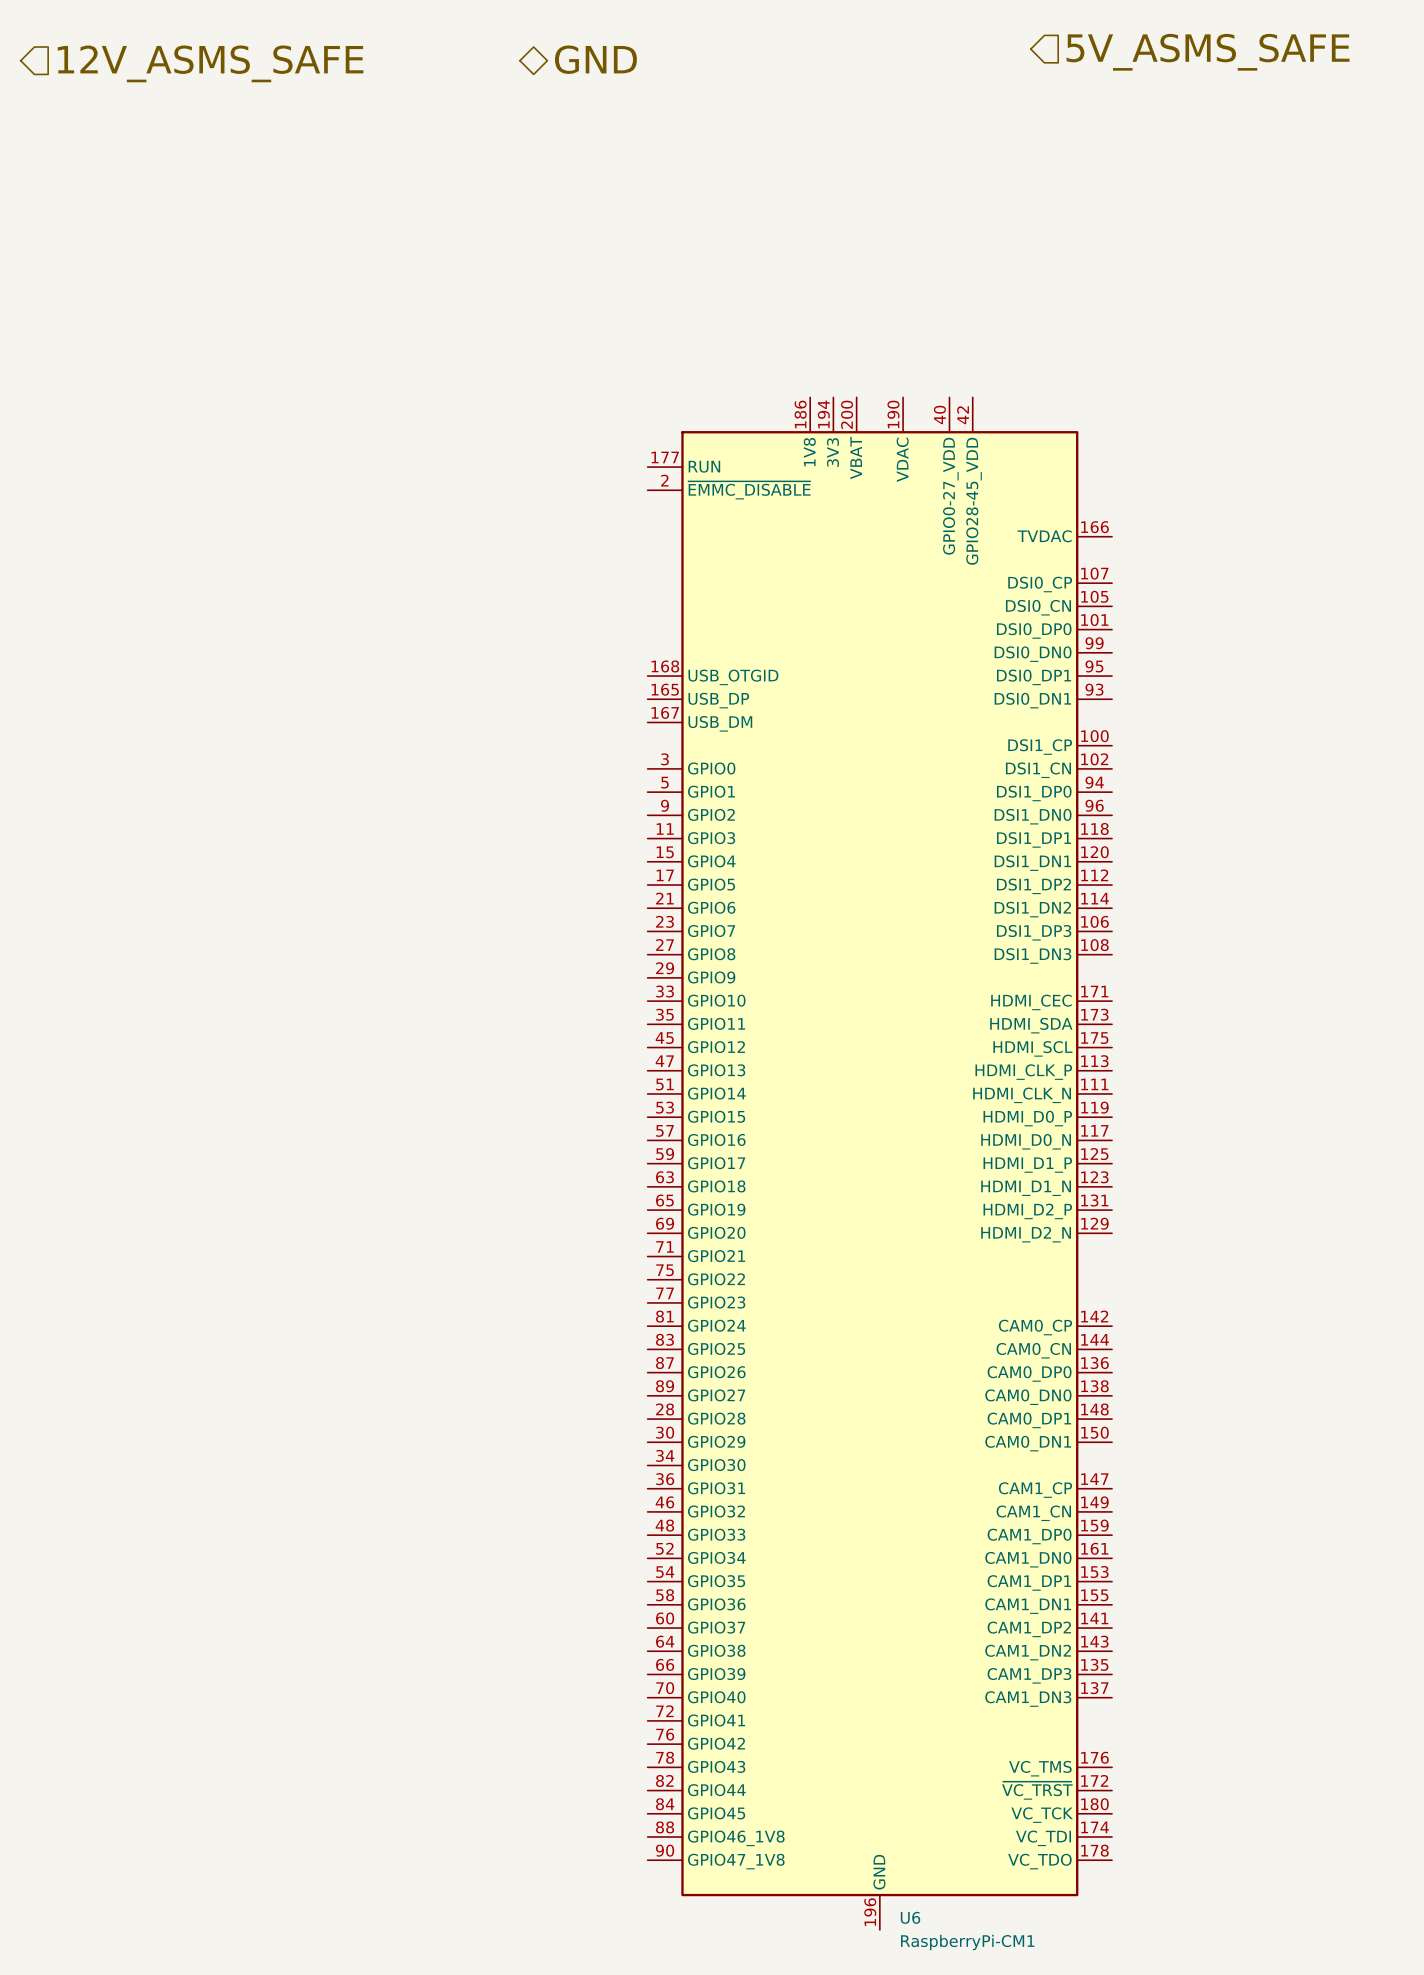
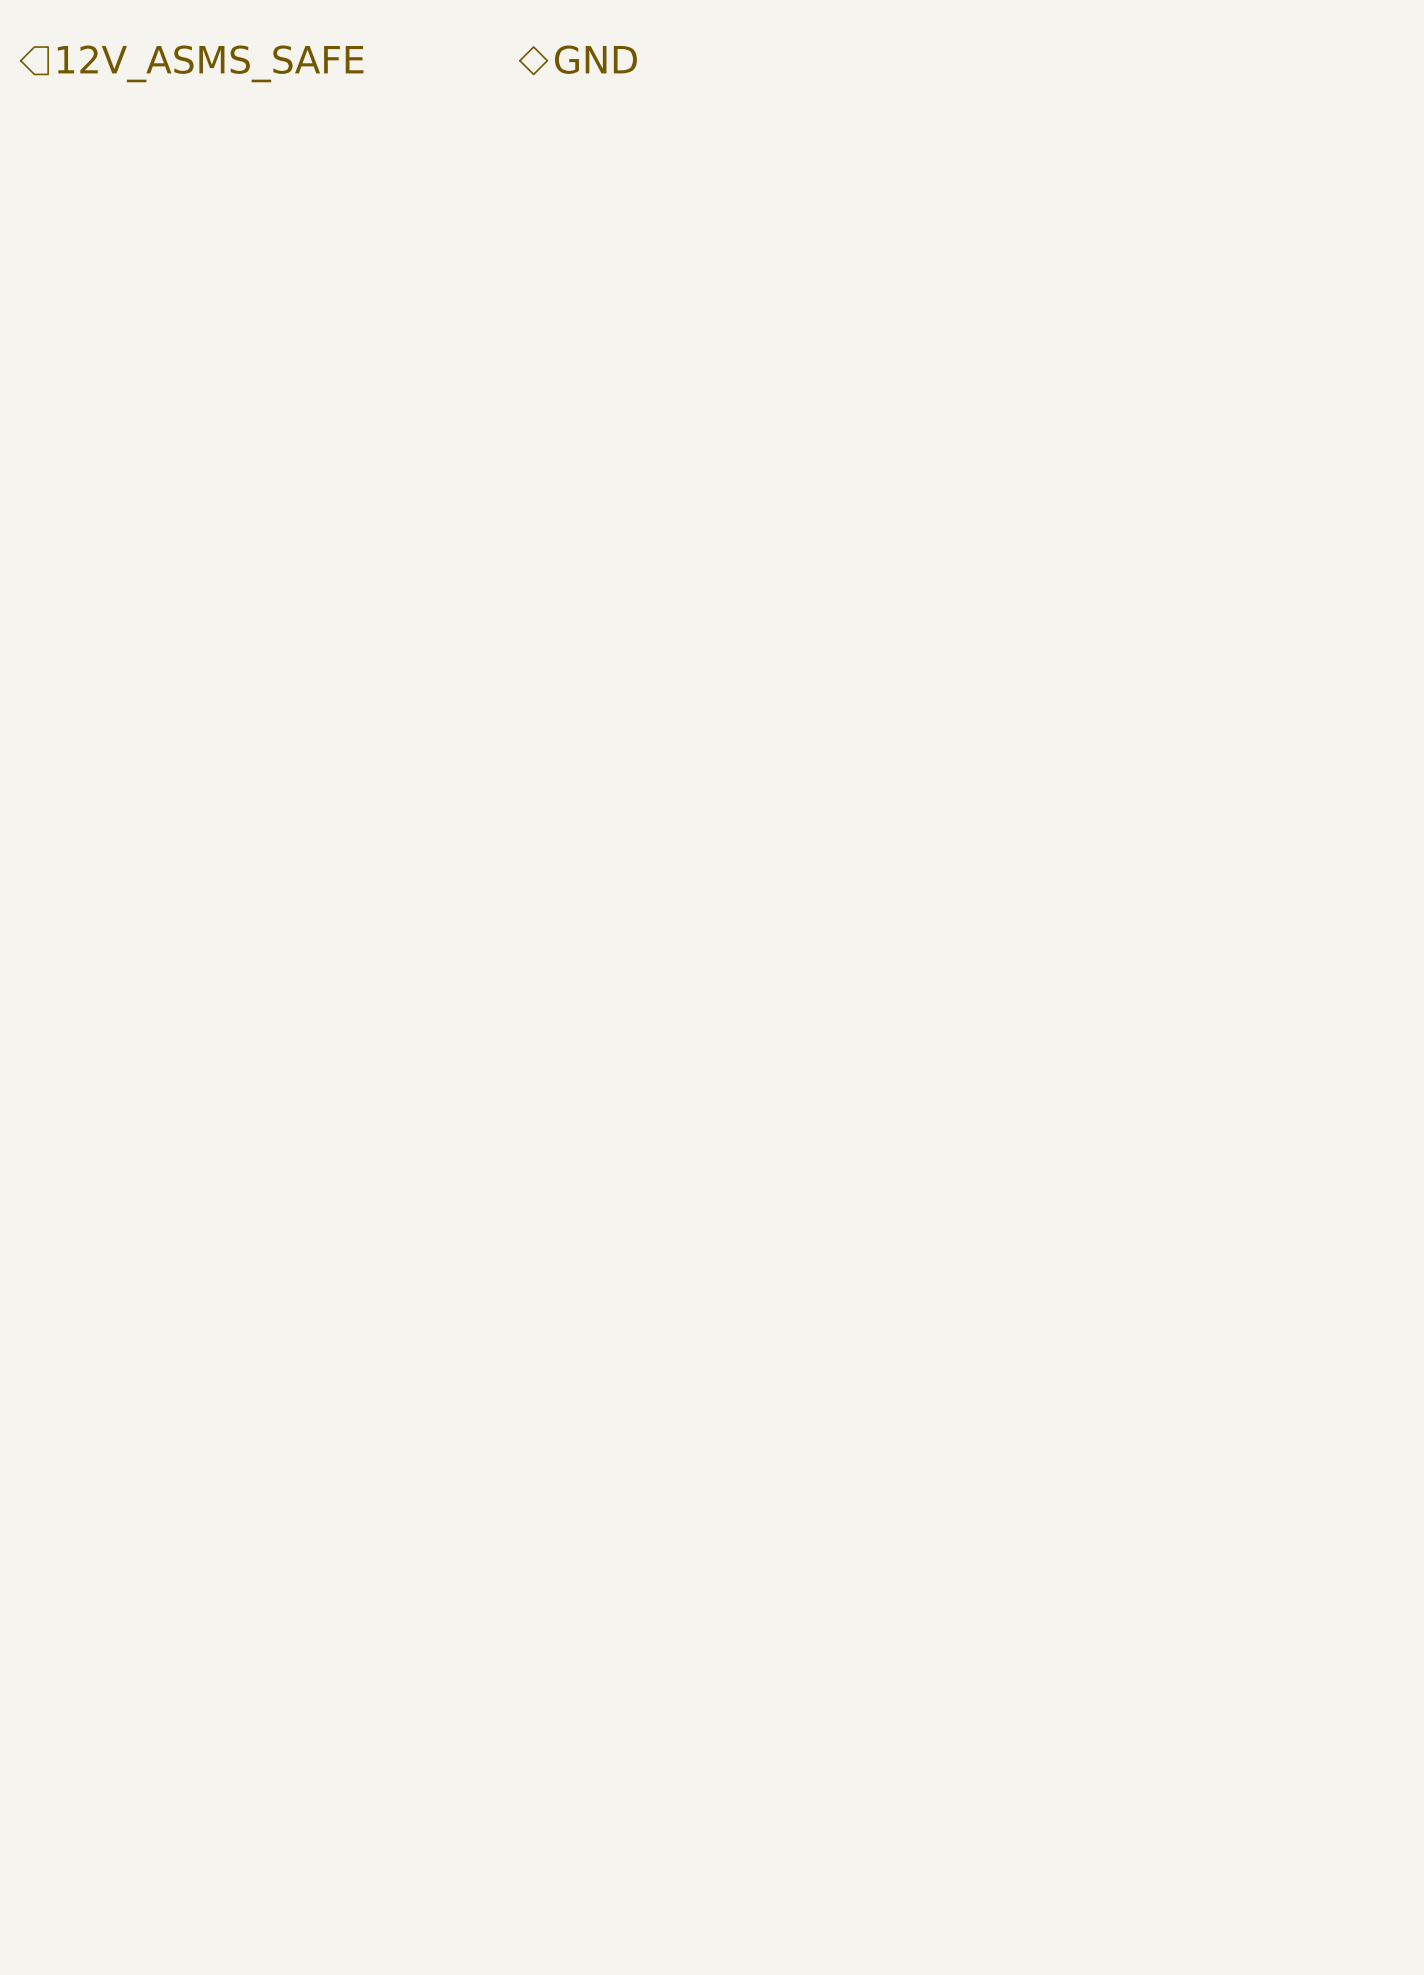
hierarchical label: 5V_ASMS_SAFE (1208, 52) -> none
U6: RaspberryPi-CM1 (879, 1163) -> none

